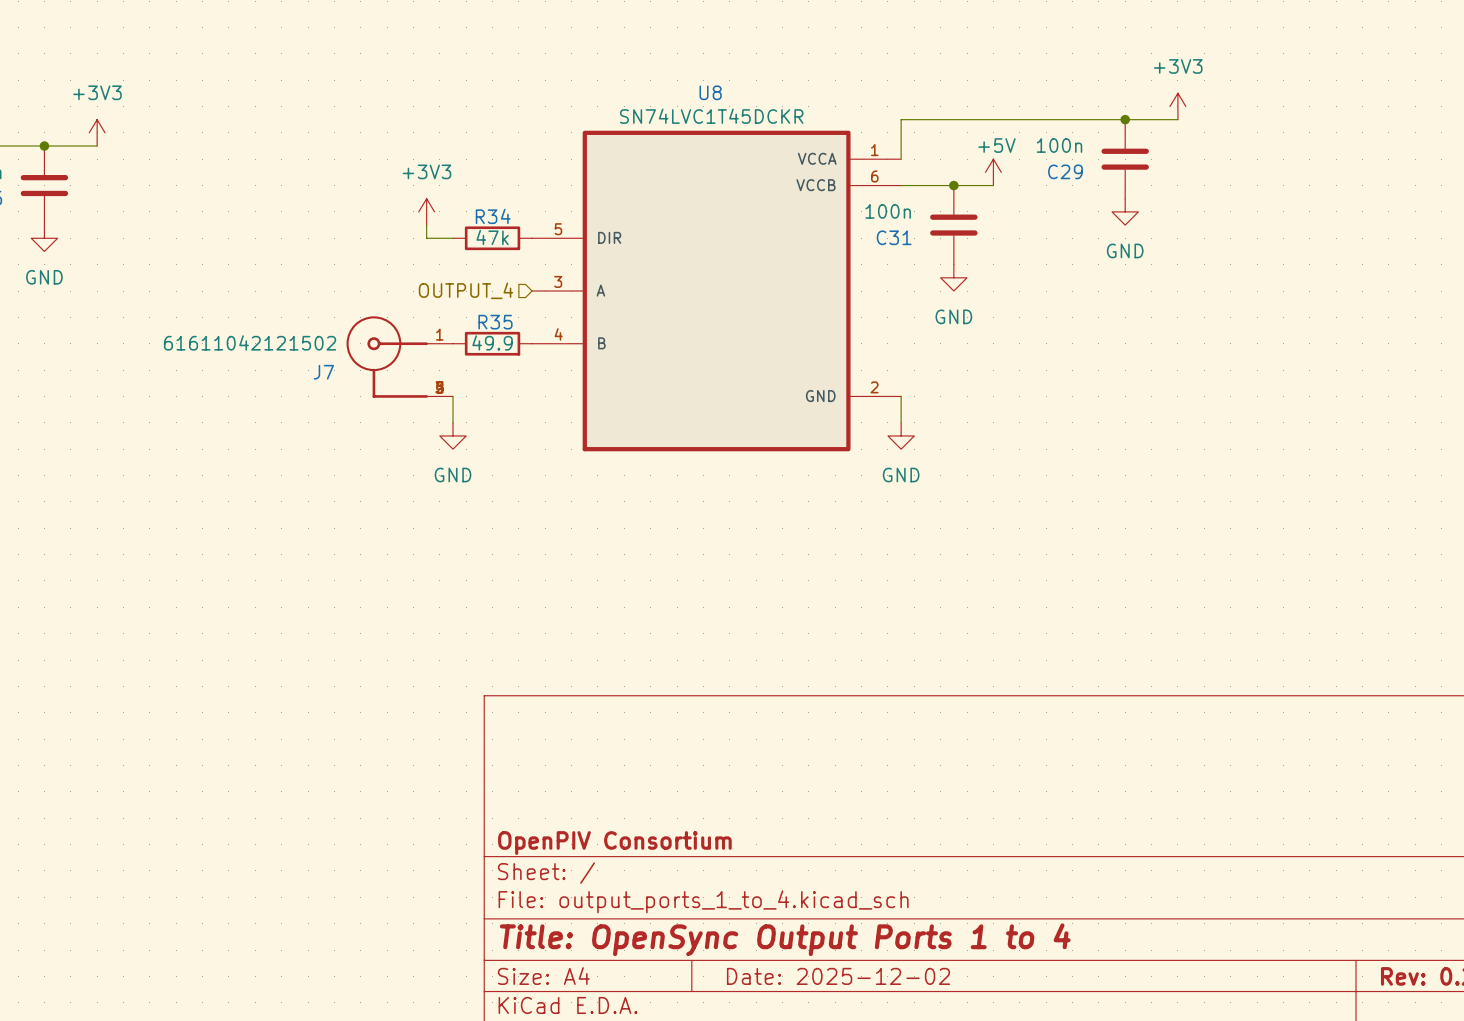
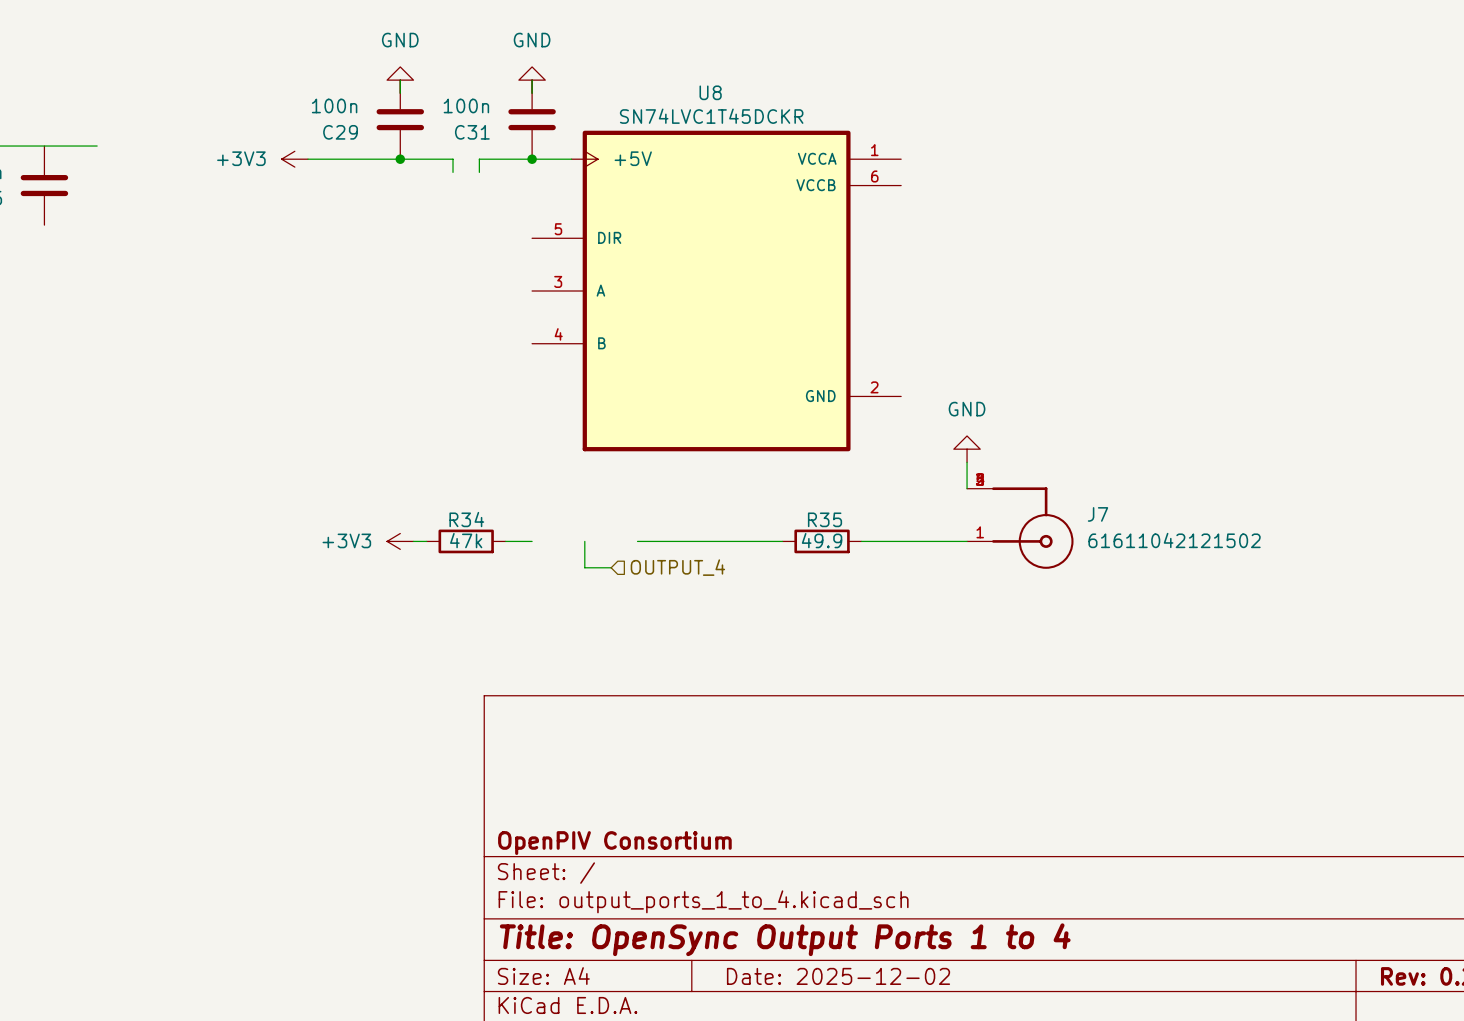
wire: none -> (400, 80) (400, 93)
power symbol: none -> GND (400, 80)
wire: none -> (532, 80) (532, 93)
power symbol: none -> GND (532, 80)
power symbol: +3V3 (1177, 106) -> none
junction: (1125, 119) -> none
wire: (1177, 119) (901, 119) (901, 159) -> none
power symbol: +3V3 (97, 132) -> none
junction: (44, 146) -> none
power symbol: none -> +3V3 (294, 159)
wire: none -> (308, 159) (453, 159) (453, 172)
junction: none -> (400, 159)
junction: none -> (532, 159)
wire: none -> (571, 159) (479, 159) (479, 172)
power symbol: none -> +5V (584, 159)
C29 position: (1125, 159) -> (400, 119)
power symbol: +5V (993, 172) -> none
wire: (901, 185) (993, 185) -> none
junction: (953, 185) -> none
power symbol: +3V3 (426, 211) -> none
power symbol: GND (1125, 211) -> none
wire: (426, 225) (426, 238) (453, 238) -> none
C31 position: (953, 225) -> (532, 119)
power symbol: GND (44, 238) -> none
R34 position: (492, 238) -> (466, 541)
power symbol: GND (953, 277) -> none
hierarchical label: OUTPUT_4 (465, 290) -> none
R35 position: (492, 343) -> (822, 541)
J7 rotation: 0° (387, 357) -> 180° (1032, 528)
J7 position: (399, 357) -> (1020, 528)
wire: (453, 396) (453, 422) -> none
wire: (901, 396) (901, 422) -> (967, 462) (967, 488)
power symbol: GND (453, 435) -> none
power symbol rotation: 0° (901, 435) -> 180° (967, 449)
power symbol position: GND (901, 435) -> GND (967, 449)
power symbol: none -> +3V3 (400, 541)
wire: none -> (413, 541) (426, 541)
wire: none -> (505, 541) (532, 541)
wire: none -> (584, 541) (584, 567) (611, 567)
wire: none -> (637, 541) (782, 541)
wire: none -> (861, 541) (967, 541)
hierarchical label: none -> OUTPUT_4 (677, 567)

